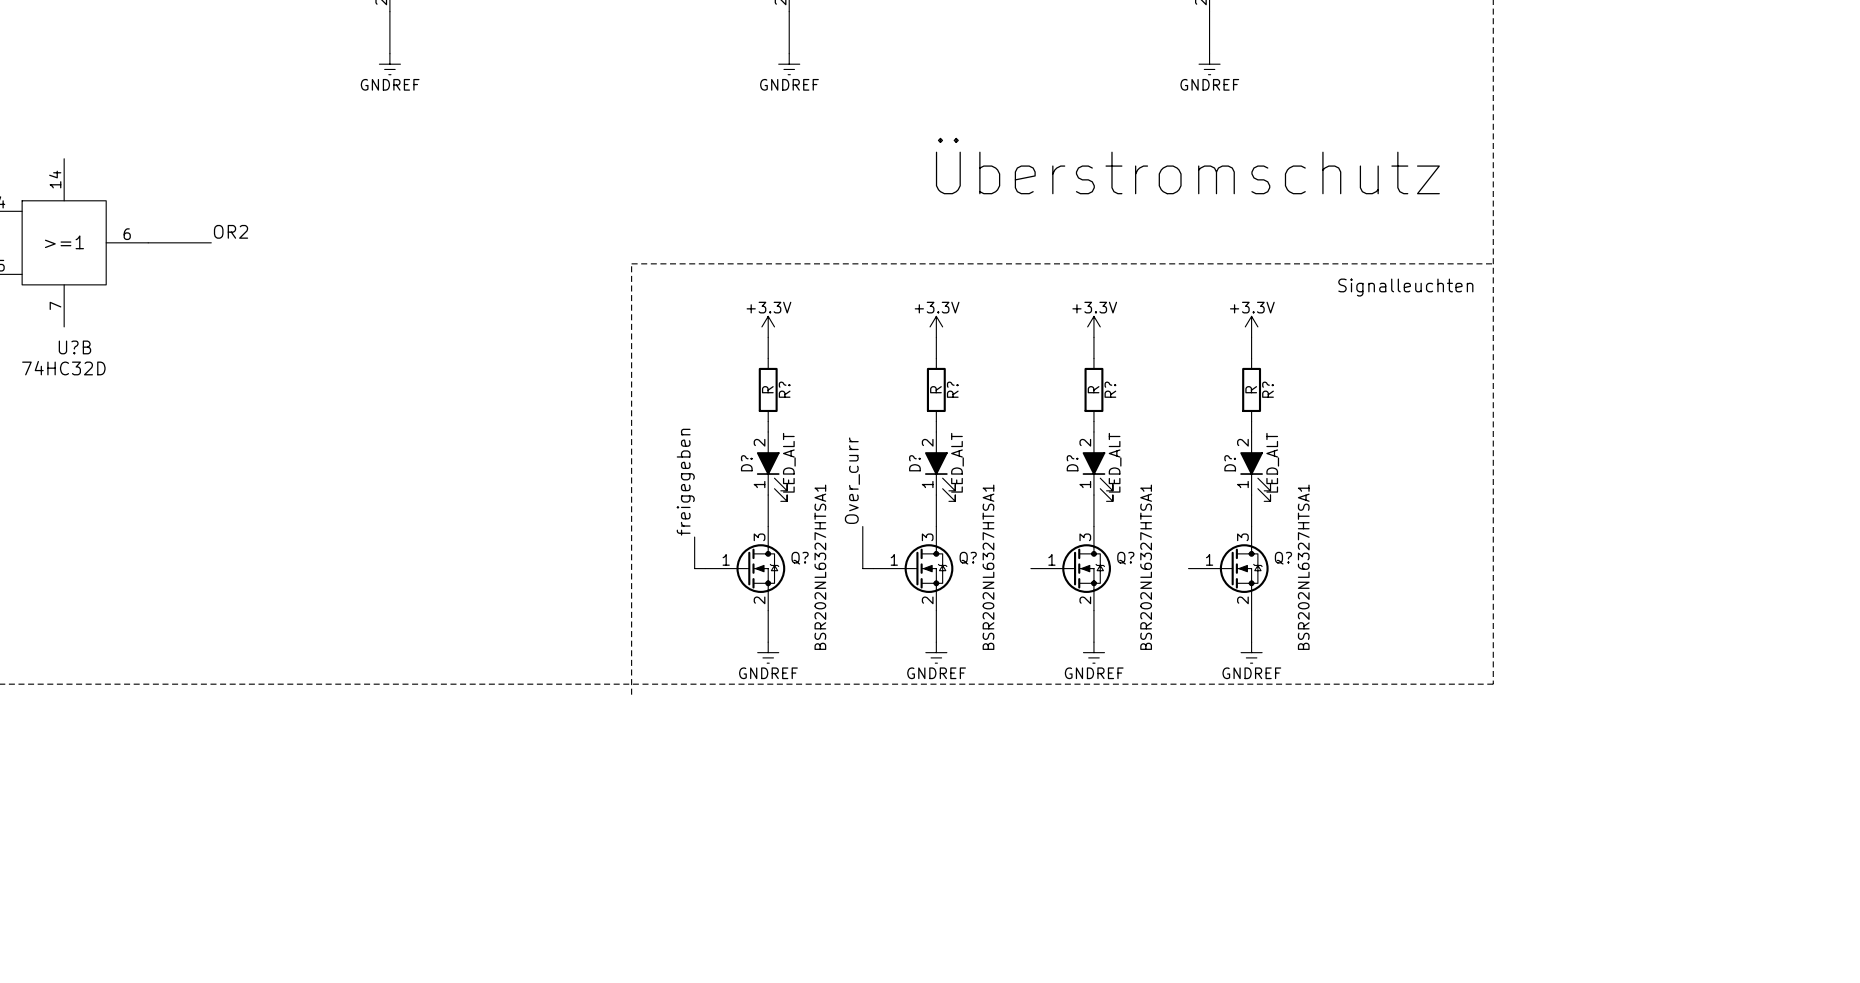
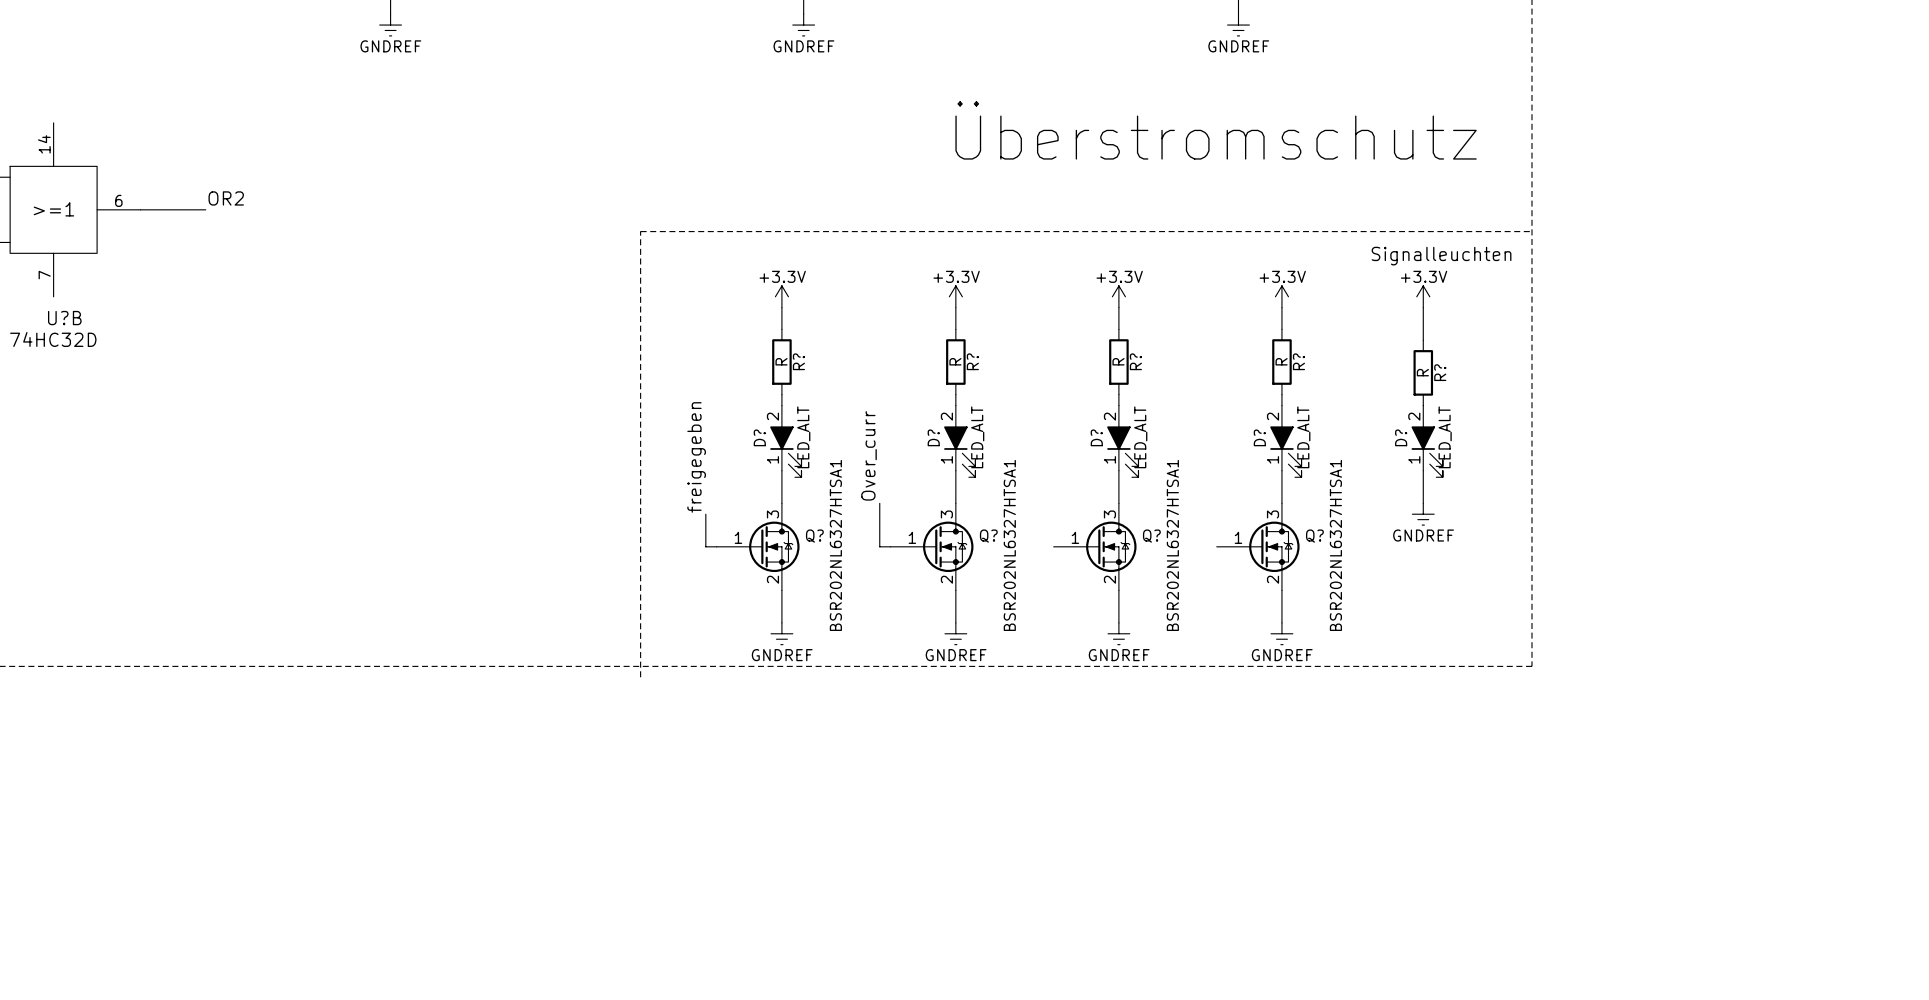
power symbol: none -> +3.3V (1423, 296)
wire: none -> (1423, 307) (1423, 340)
R?: none -> R (1423, 372)
D?: none -> LED_ALT (1427, 441)
wire: none -> (1423, 470) (1423, 503)
power symbol: none -> GNDREF (1423, 514)

